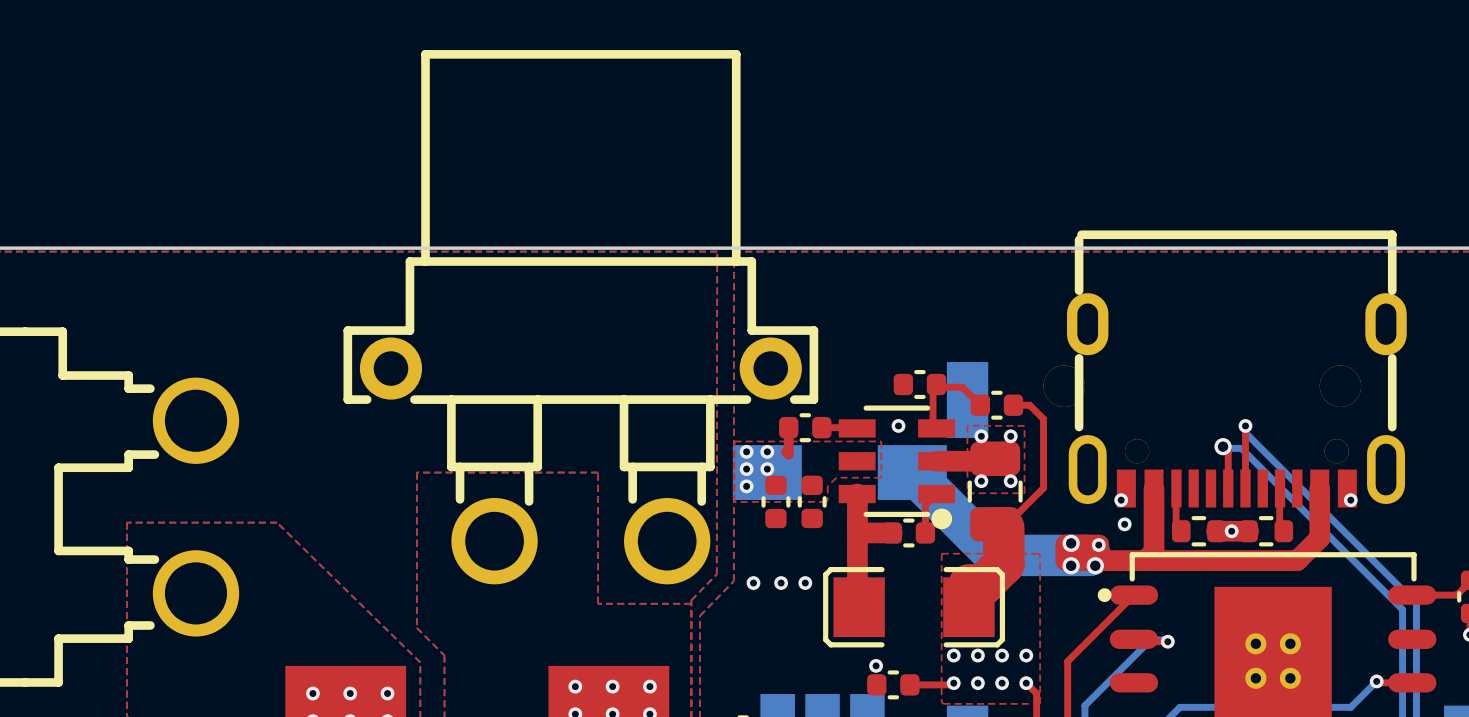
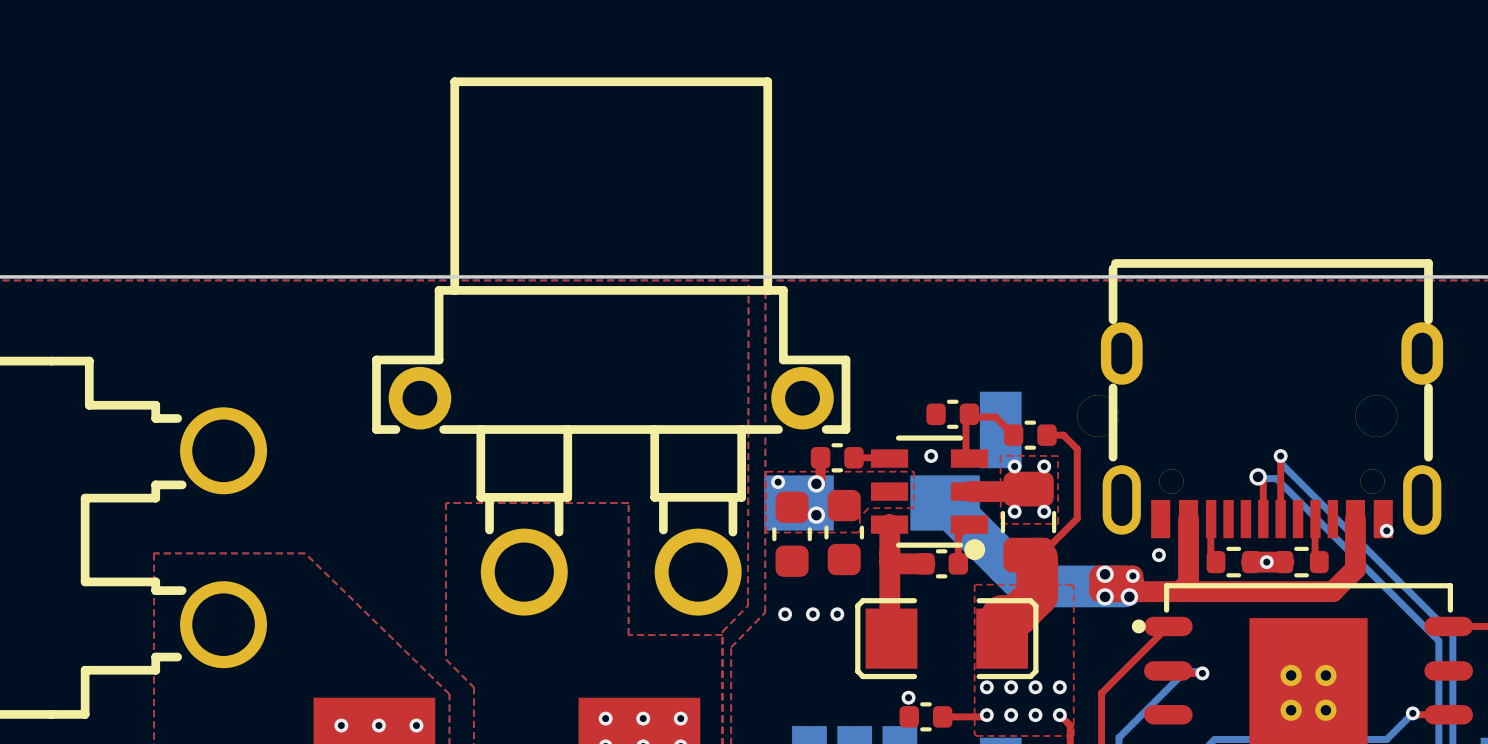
via: (767, 451) -> none
via: none -> (816, 483)
via: (746, 469) -> none
via: (767, 469) -> none
part footprint: [761, 475, 791, 529] -> [772, 491, 812, 577]
part footprint: [797, 475, 827, 529] -> [824, 489, 865, 576]
via: none -> (816, 515)
via: (746, 486) -> none
via: (1121, 500) -> none

